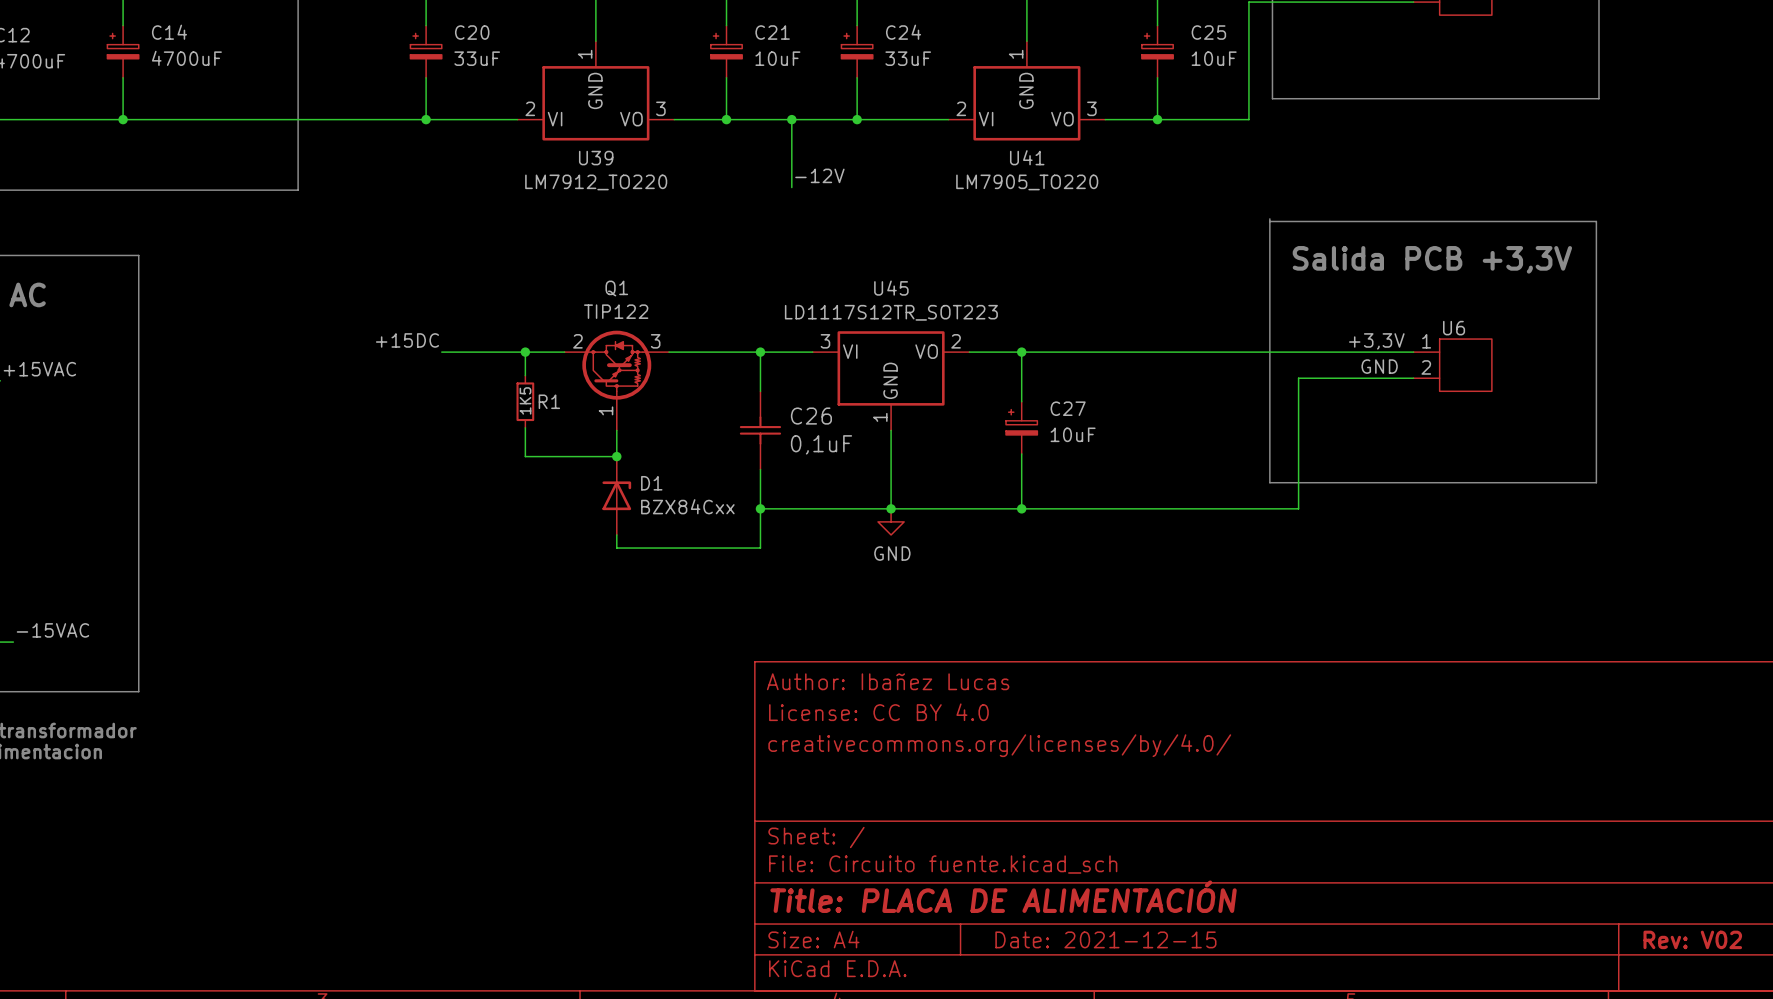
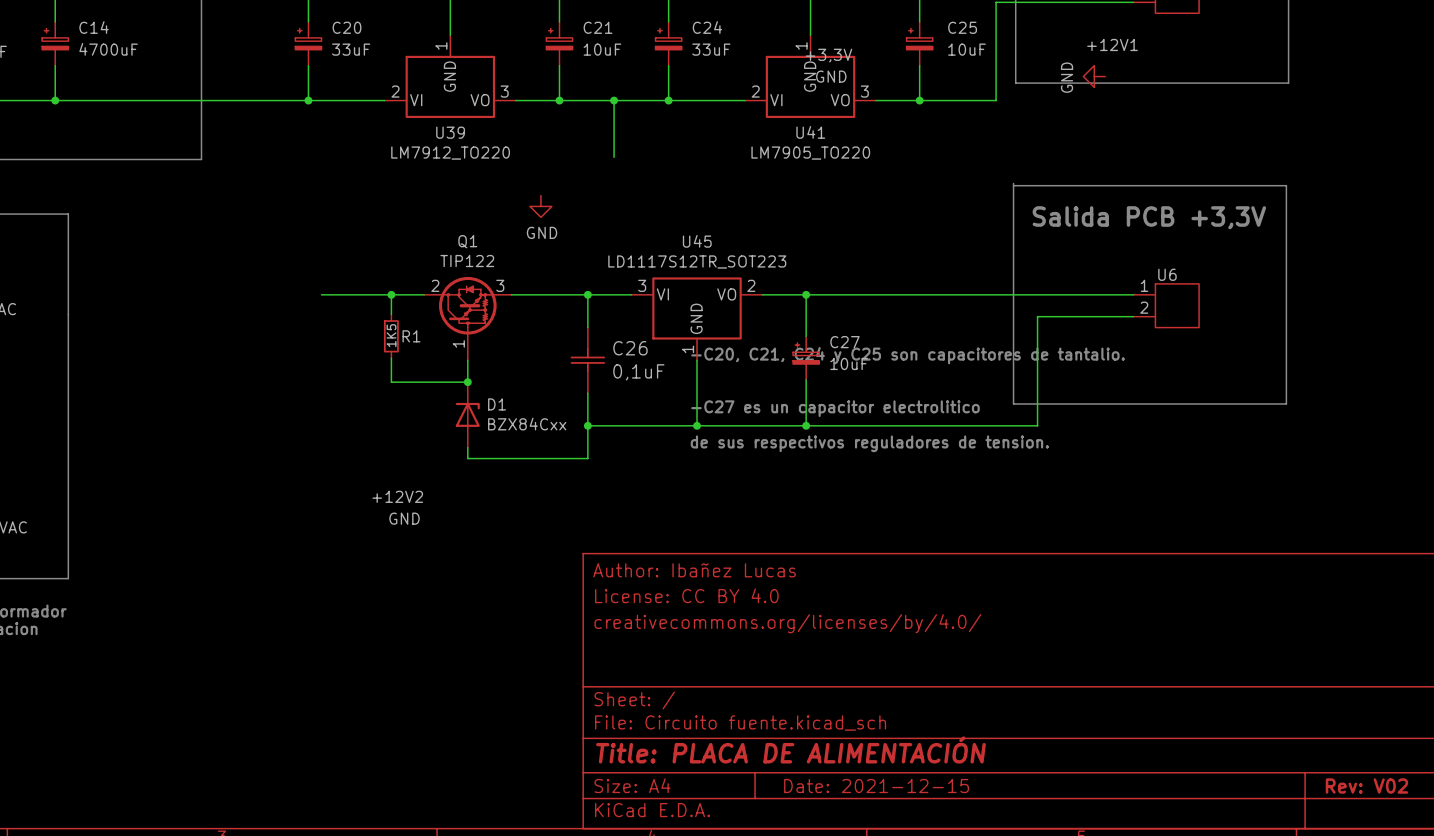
label: none -> +12V1 (1112, 44)
label: none -> +3,3V (828, 55)
label: none -> GND (831, 76)
power symbol: none -> GND (1094, 76)
label: -12V (819, 175) -> none
power symbol: none -> GND (540, 206)
label: +15DC (407, 340) -> none
label: +3,3V (1376, 341) -> none
label: GND (1379, 366) -> none
text: none -> -C20, C21, C24 y C25 son capacitores de tantalio. (908, 355)
text: none -> -C27 es un capacitor electrolitico (835, 408)
power symbol: GND (891, 521) -> none
text: none -> de sus respectivos reguladores de tension. (869, 443)
label: none -> +12V2 (397, 496)
label: none -> GND (404, 518)

